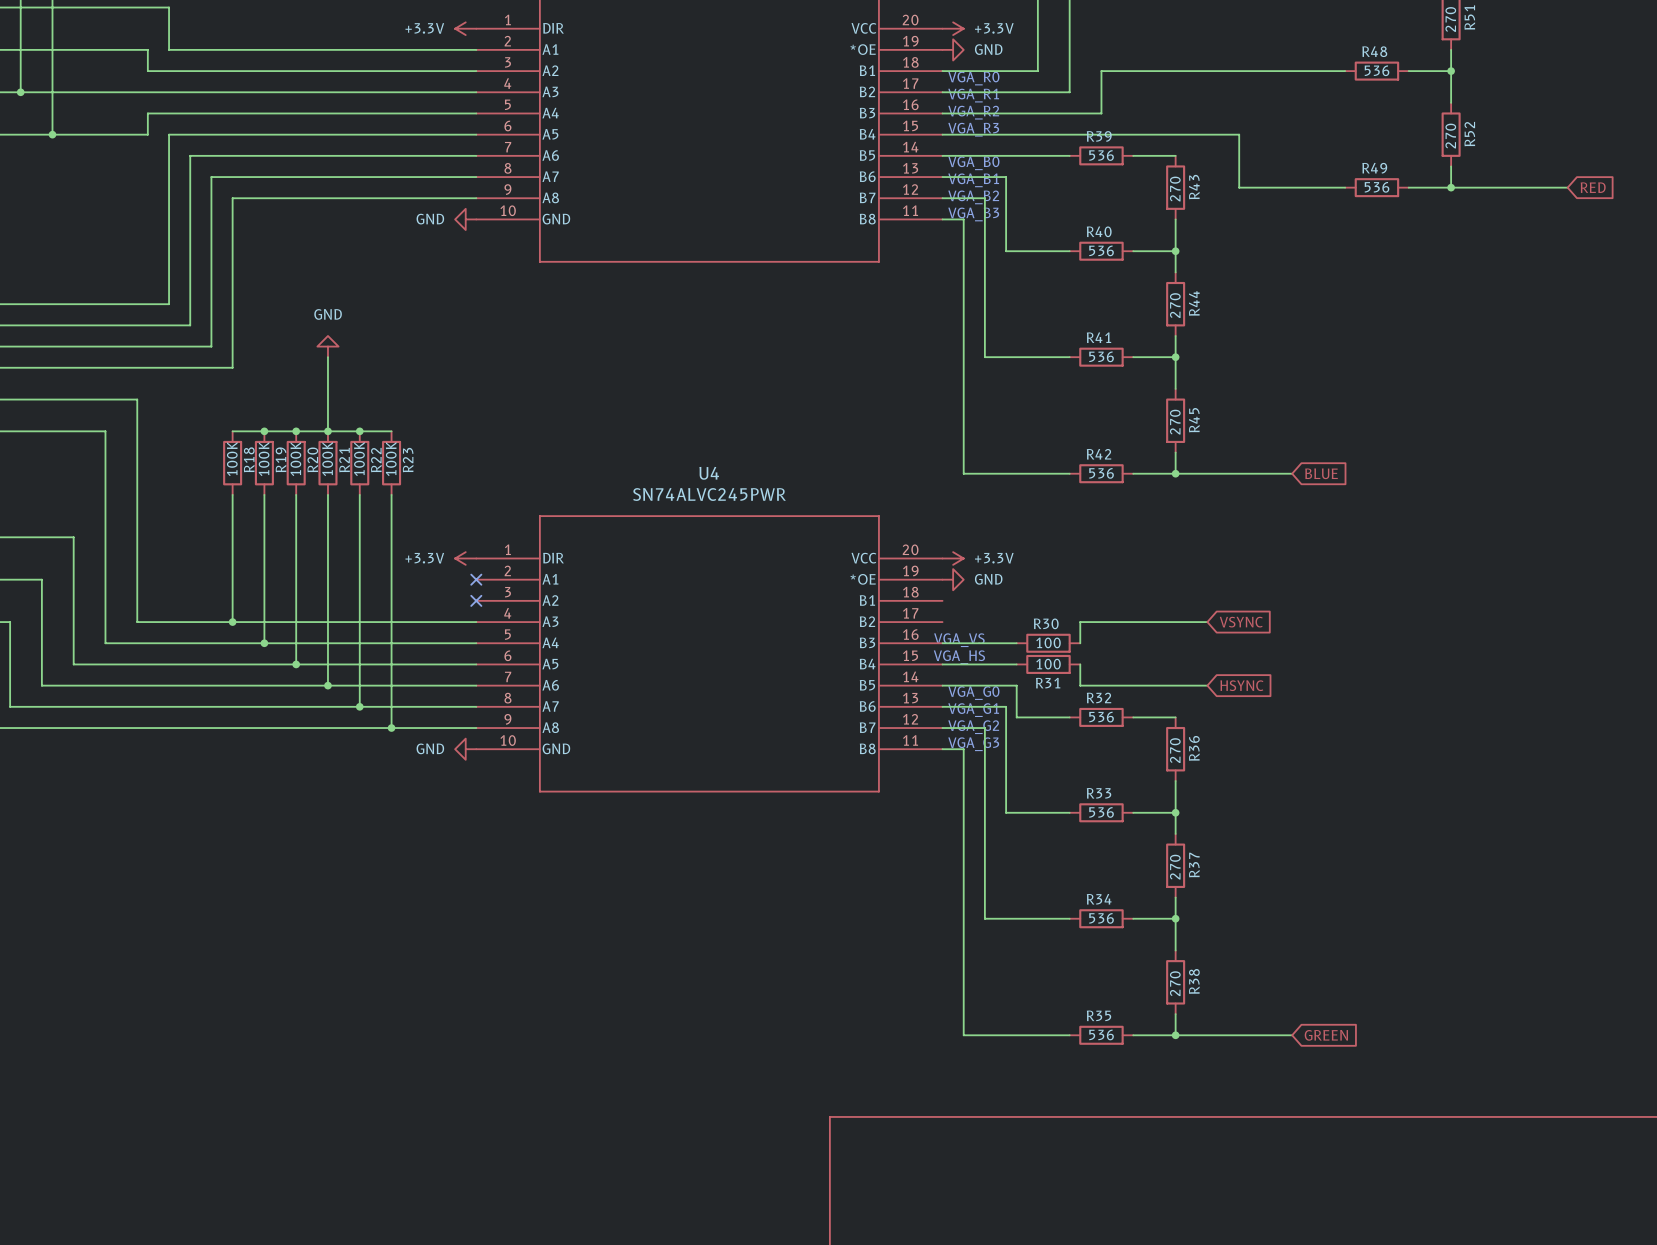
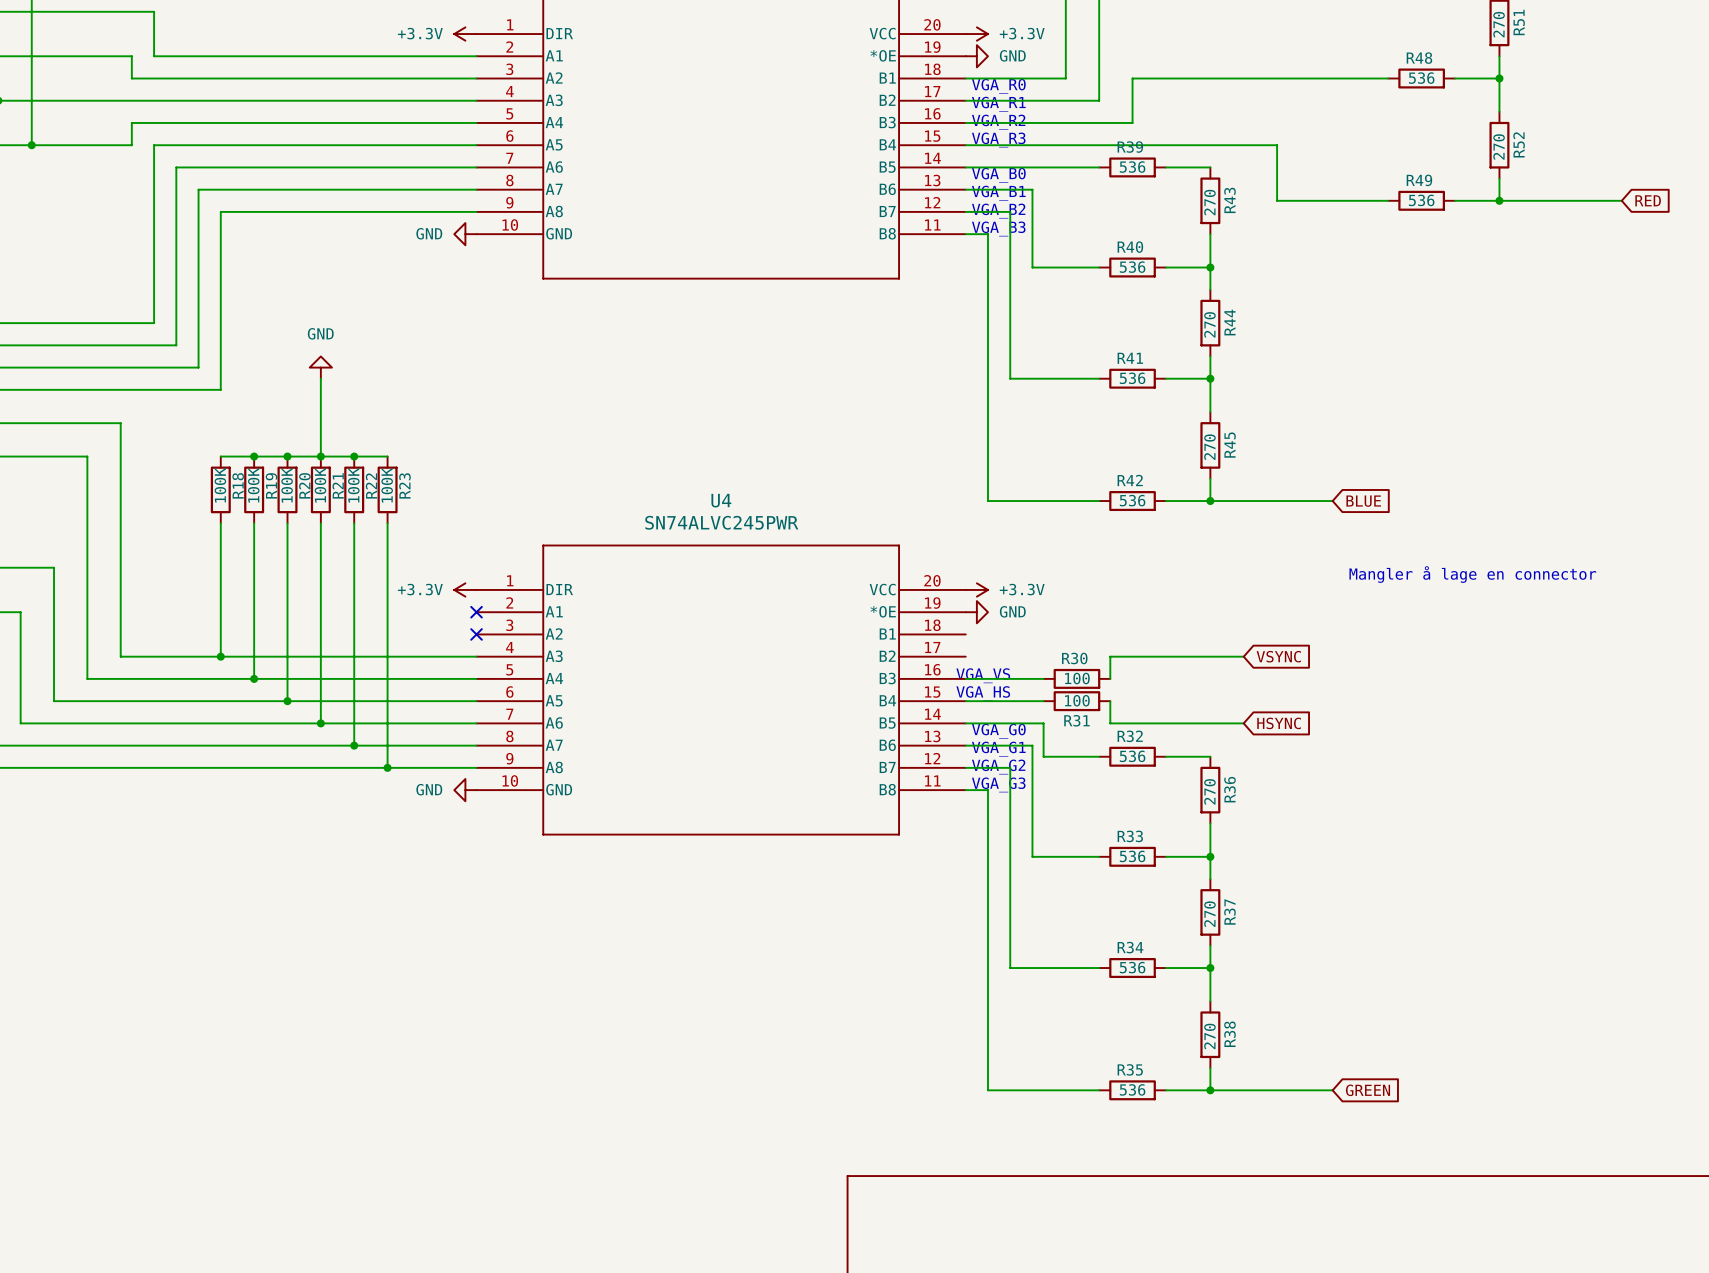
text: none -> Mangler å lage en connector (1472, 574)

